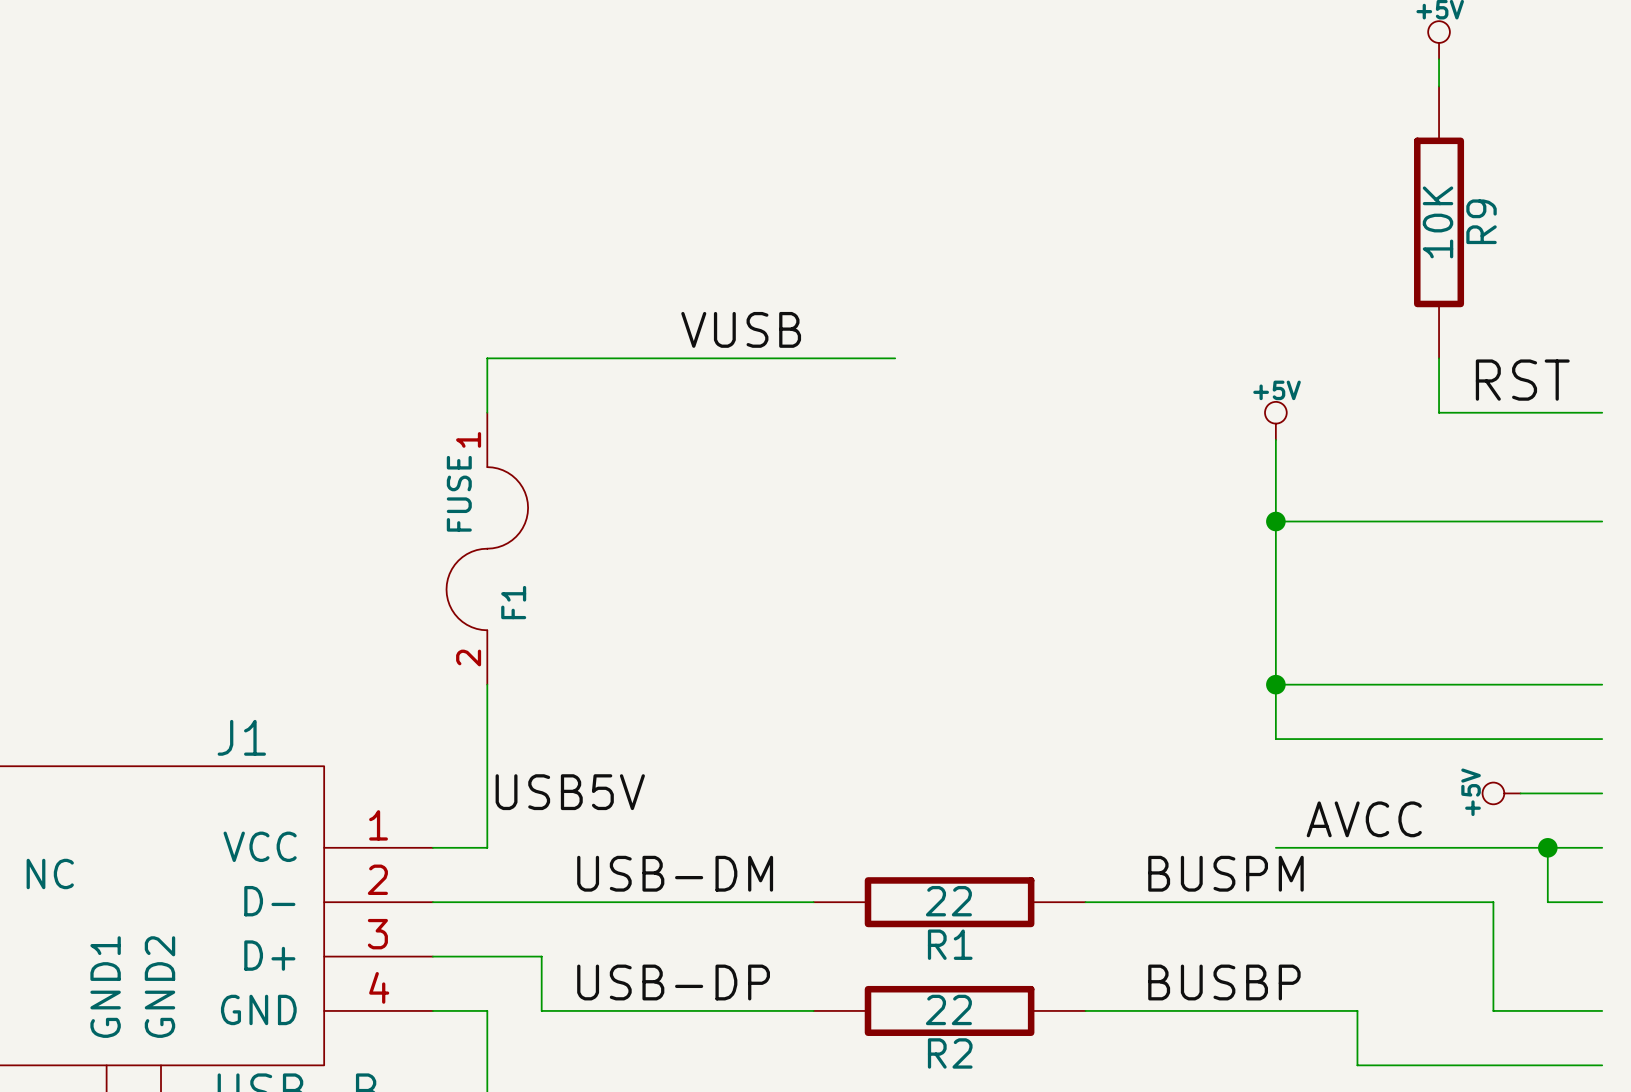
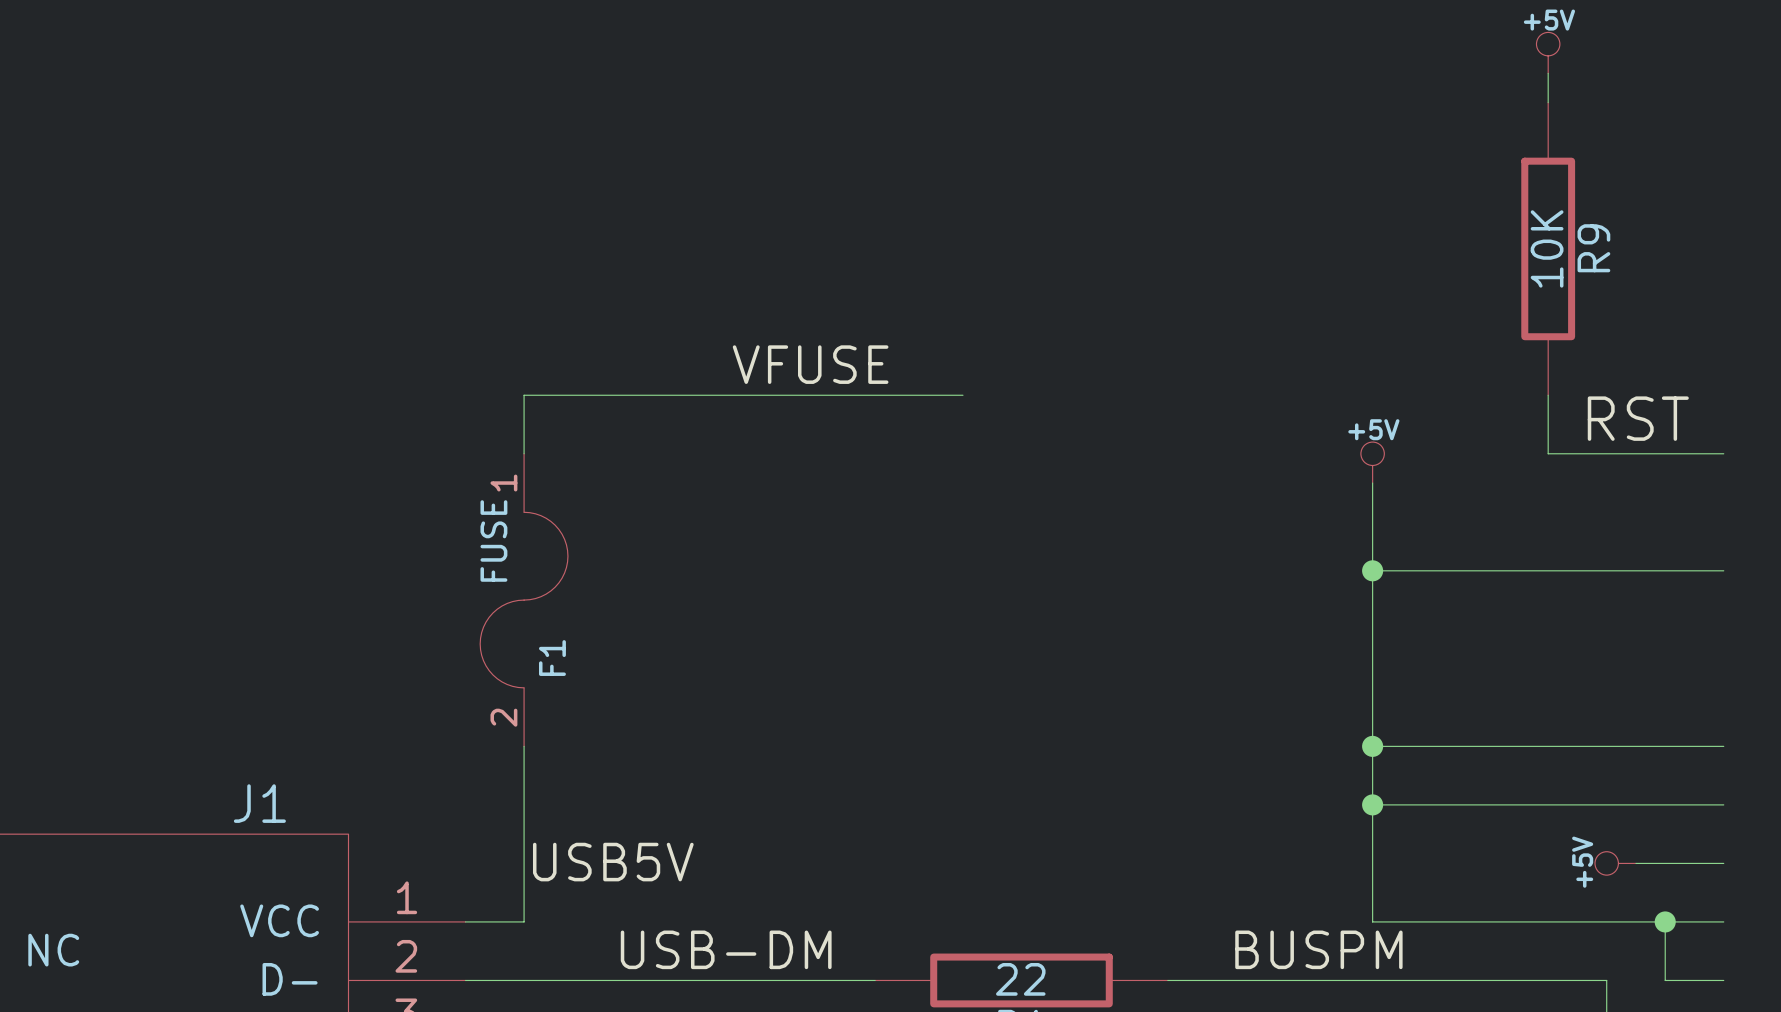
label: VUSB (741, 329) -> VFUSE (810, 364)
wire: none -> (1372, 804) (1372, 921)
junction: none -> (1372, 804)
label: AVCC (1364, 819) -> none

